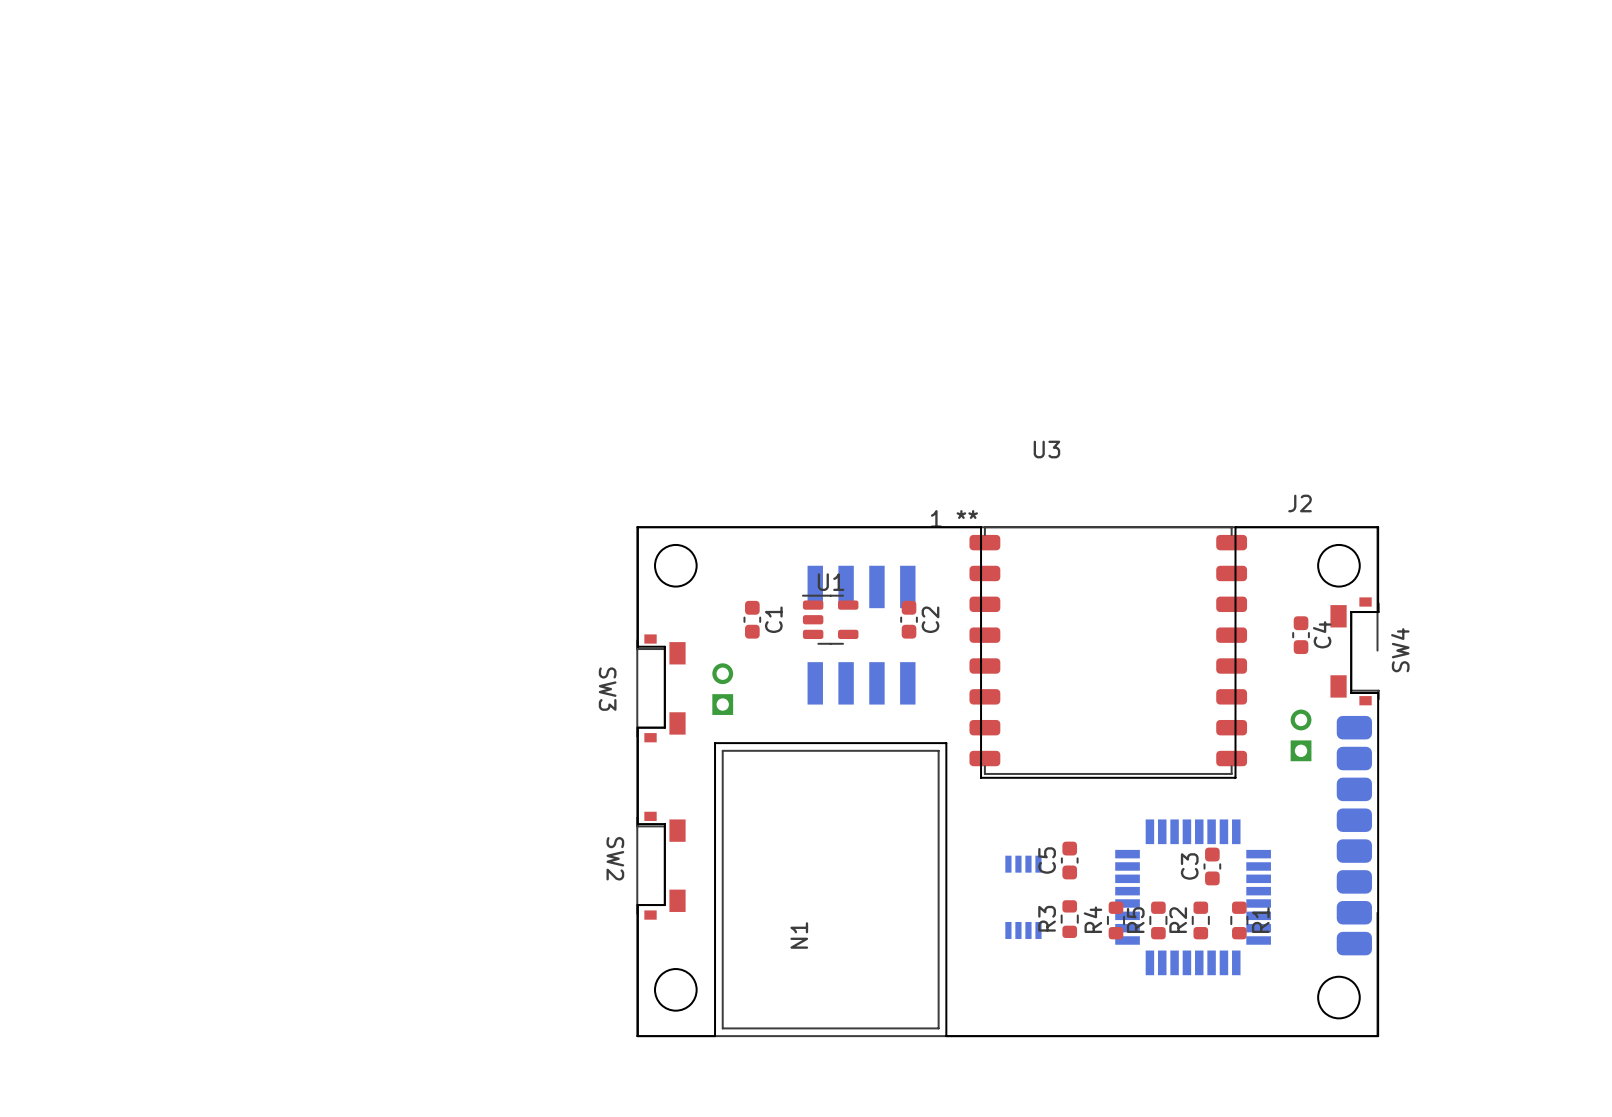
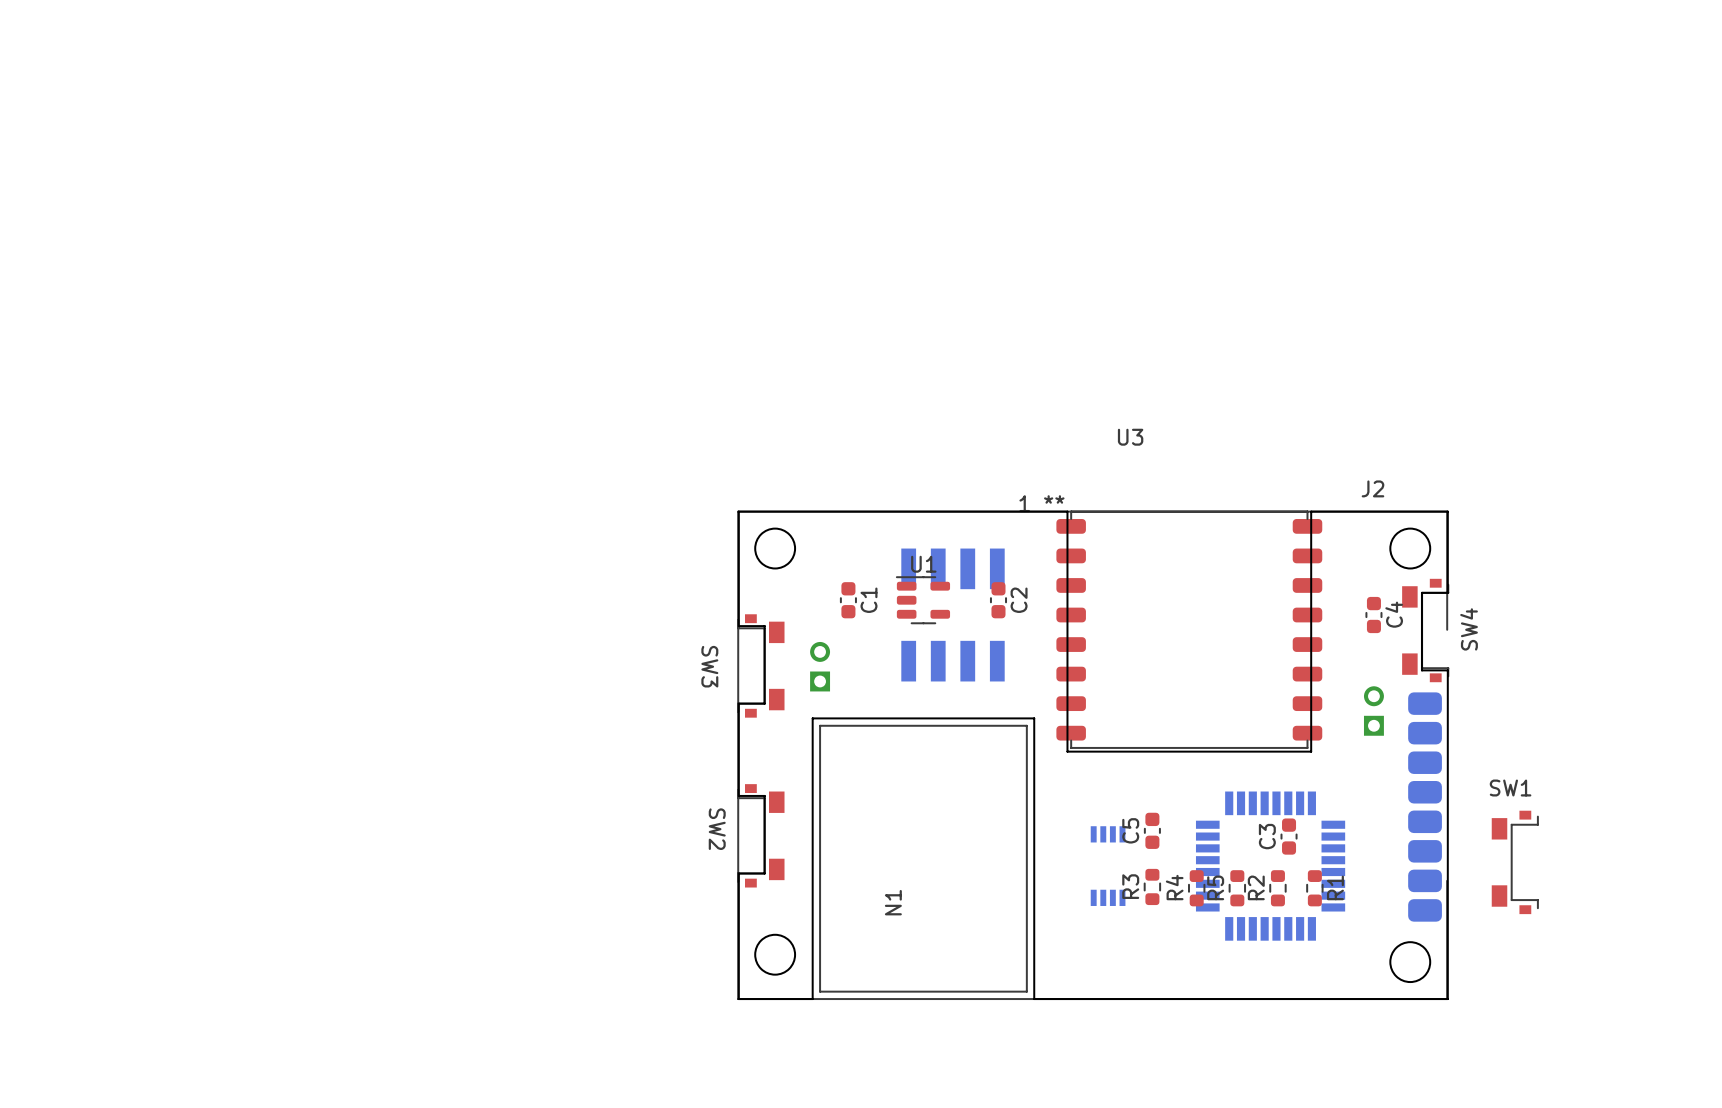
SW1: none -> (1515, 862)

